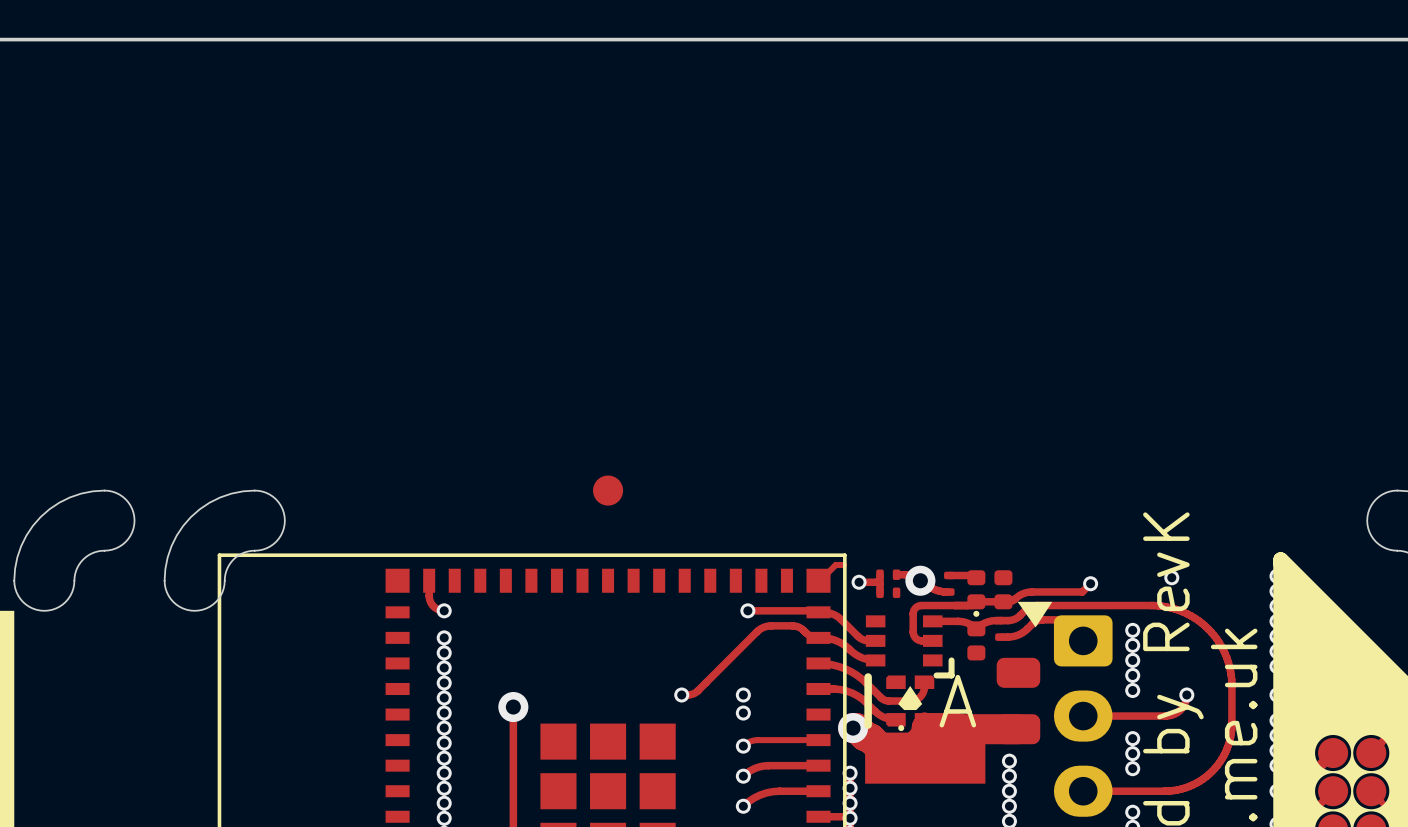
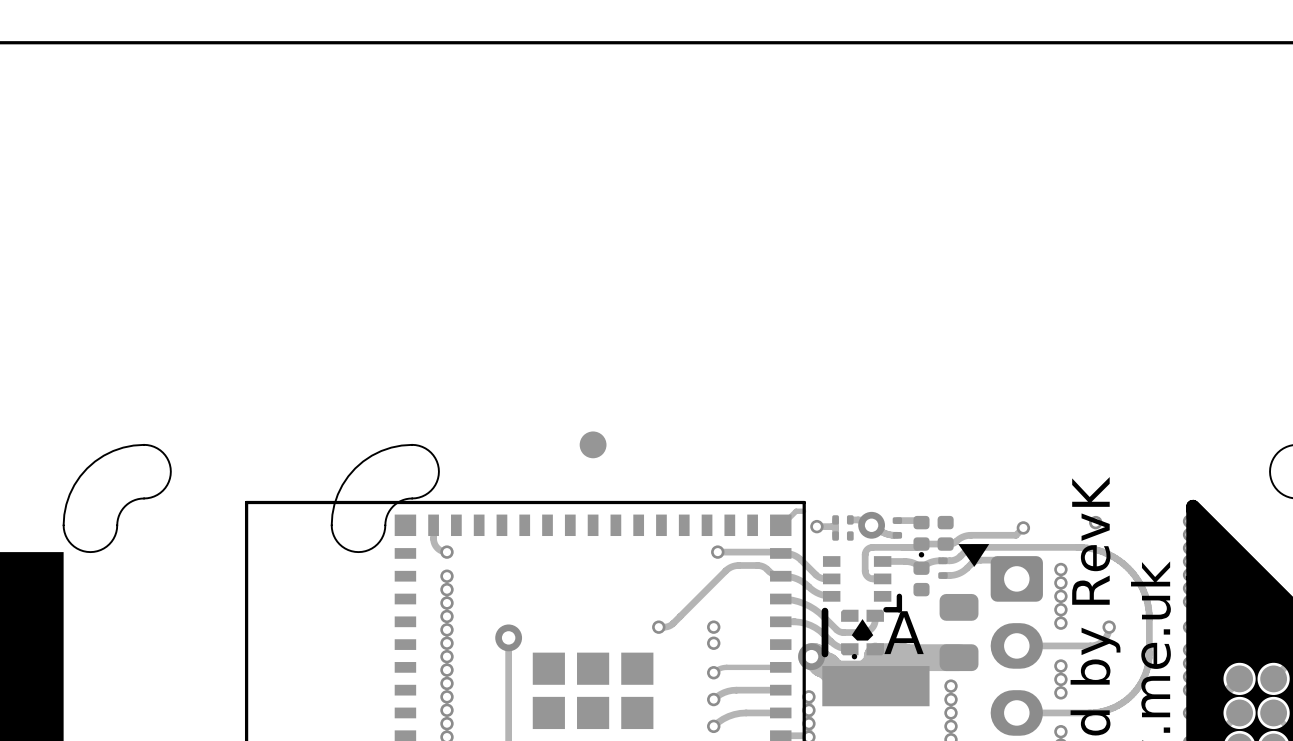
board edge: (254, 490) (231, 493) (209, 502) (191, 516) (176, 535) (167, 557) (164, 580) (168, 595) (179, 606) (194, 610) (202, 609) (212, 604) (222, 592) (226, 570) (233, 559) (244, 552) (269, 546) (280, 535) (284, 520) (280, 505) (269, 494) (254, 490) -> (412, 444) (391, 447) (371, 455) (355, 468) (342, 485) (334, 504) (331, 525) (335, 538) (345, 548) (358, 552) (374, 546) (383, 535) (386, 516) (393, 506) (403, 499) (425, 494) (435, 485) (438, 471) (435, 458) (425, 448) (412, 444)

